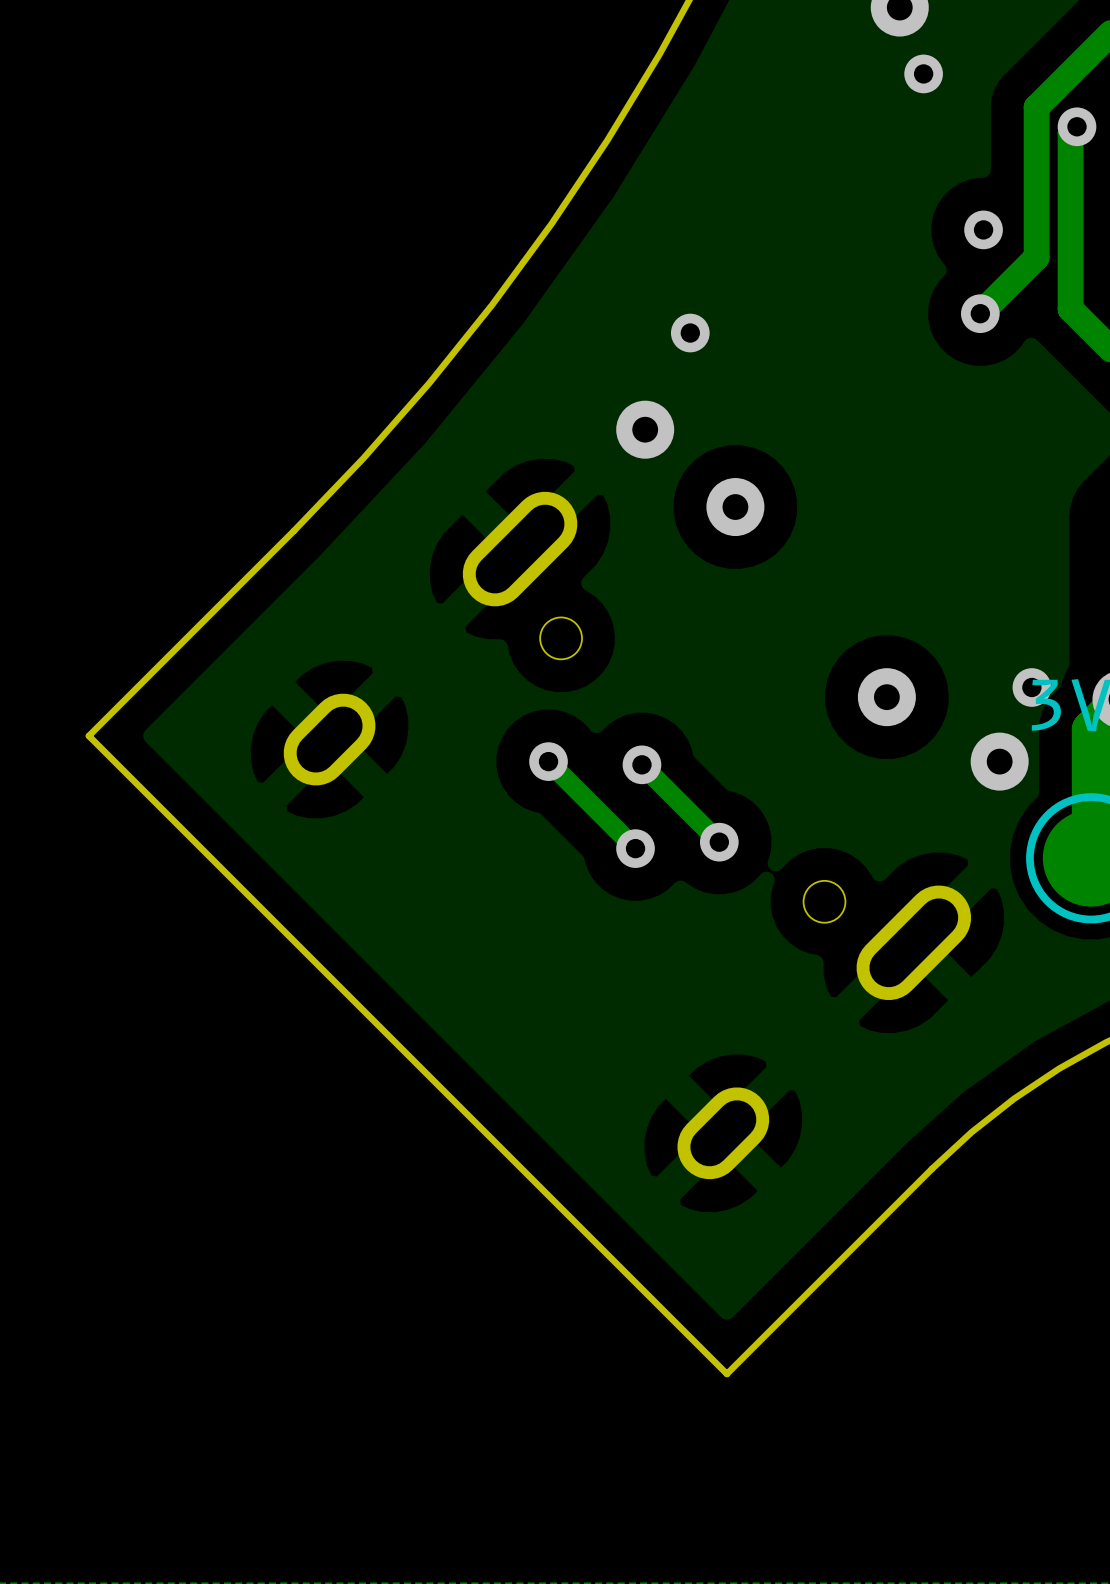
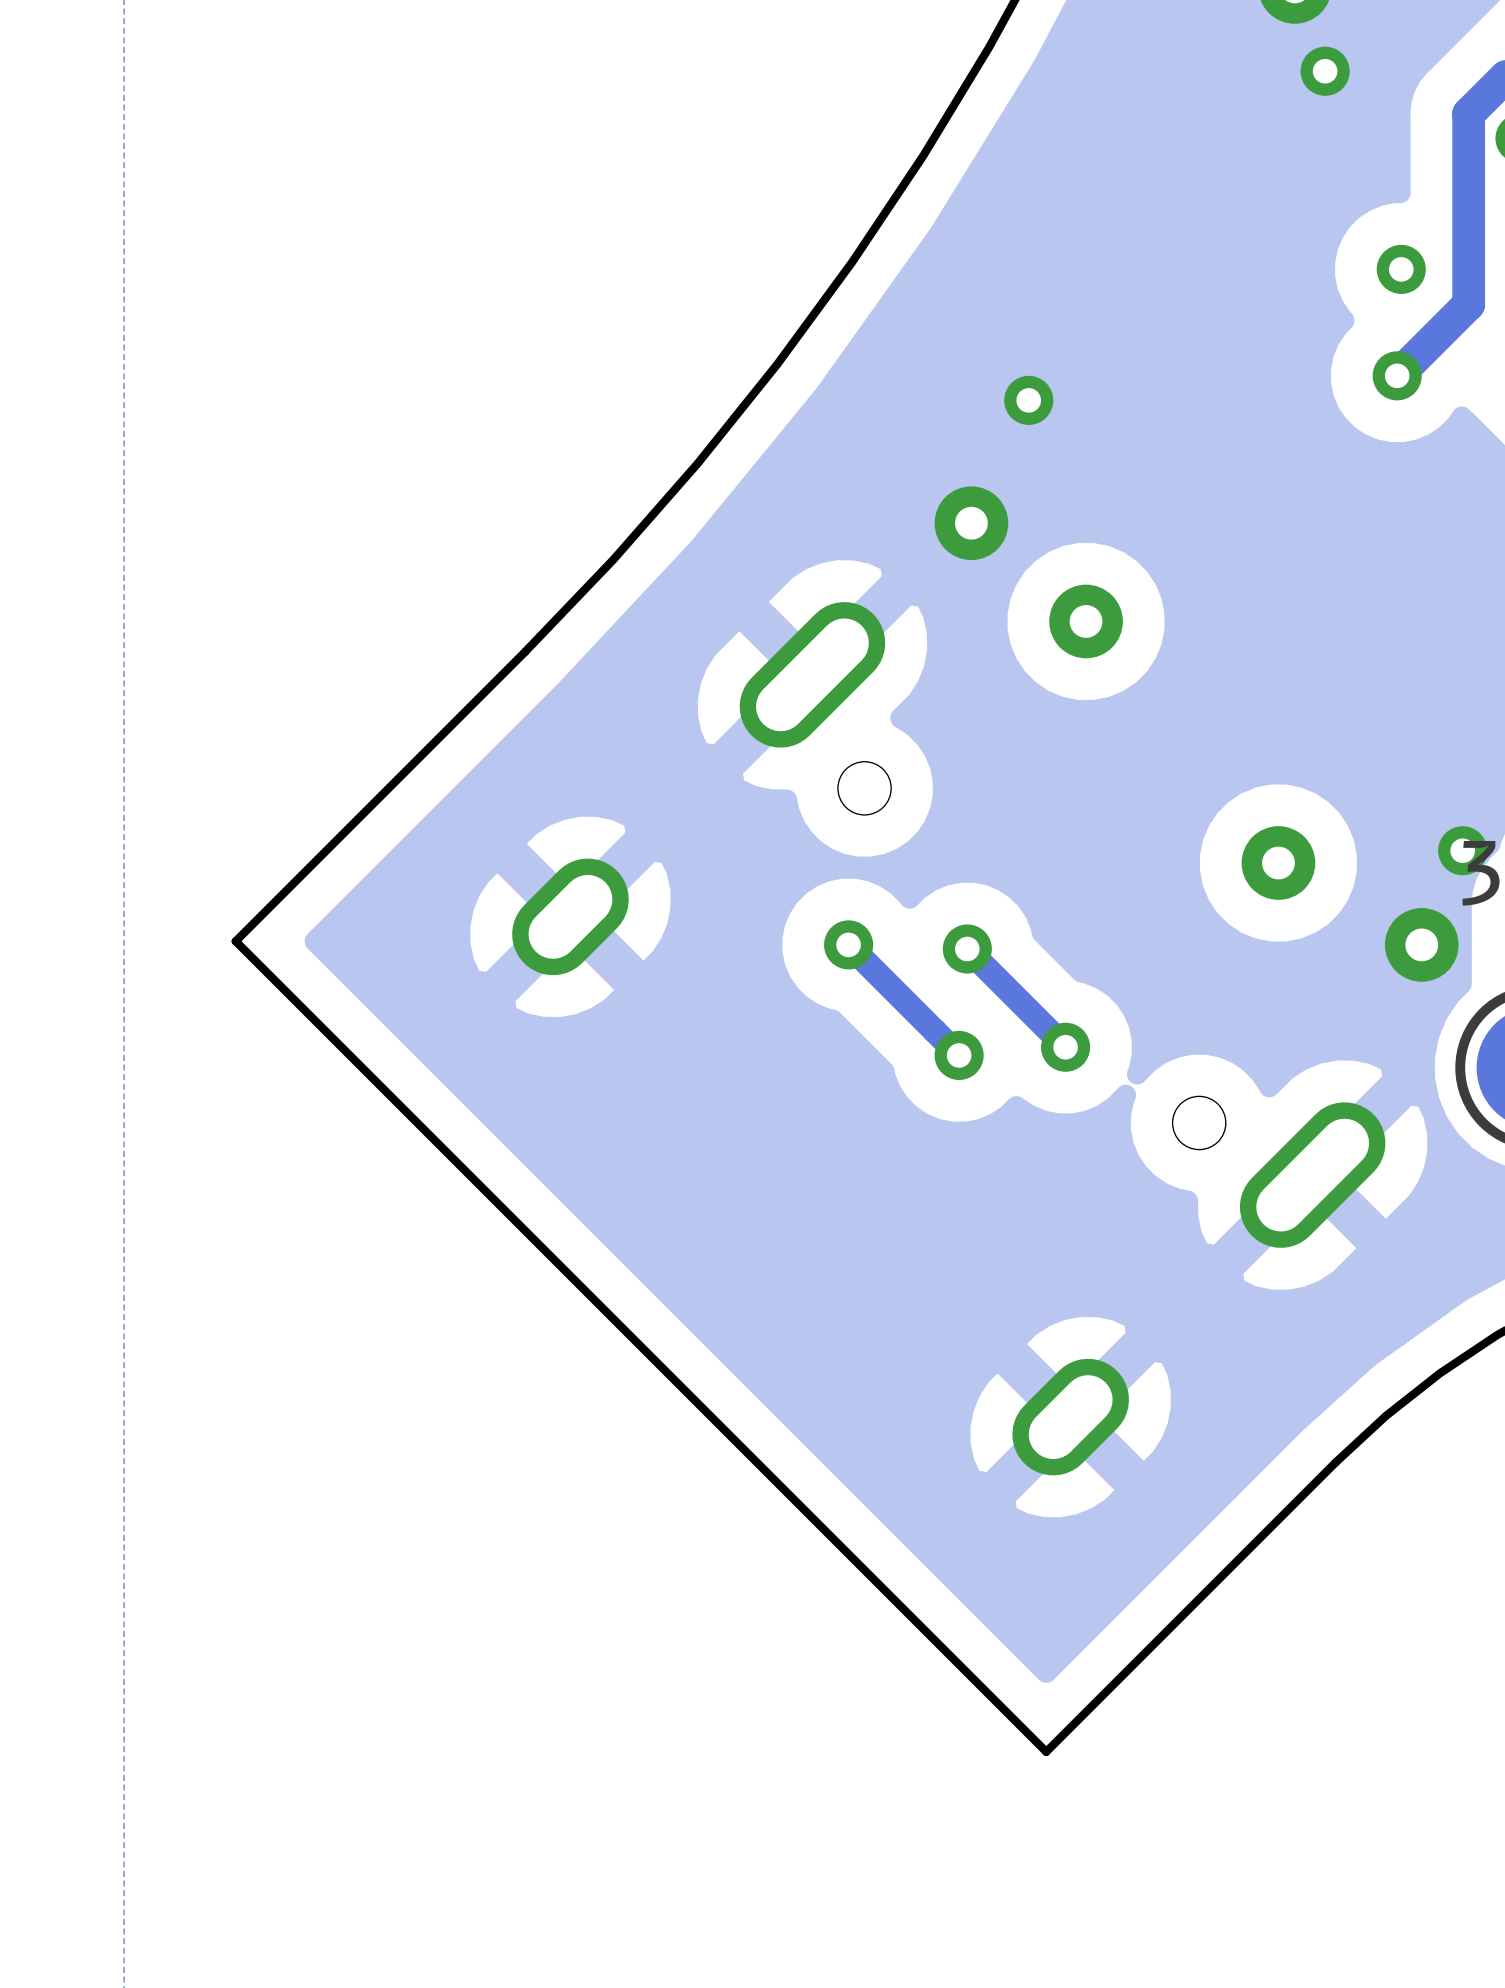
board edge: (88, 735) (726, 1373) -> (264, 912) (235, 941) (1046, 1751) (1075, 1722)

